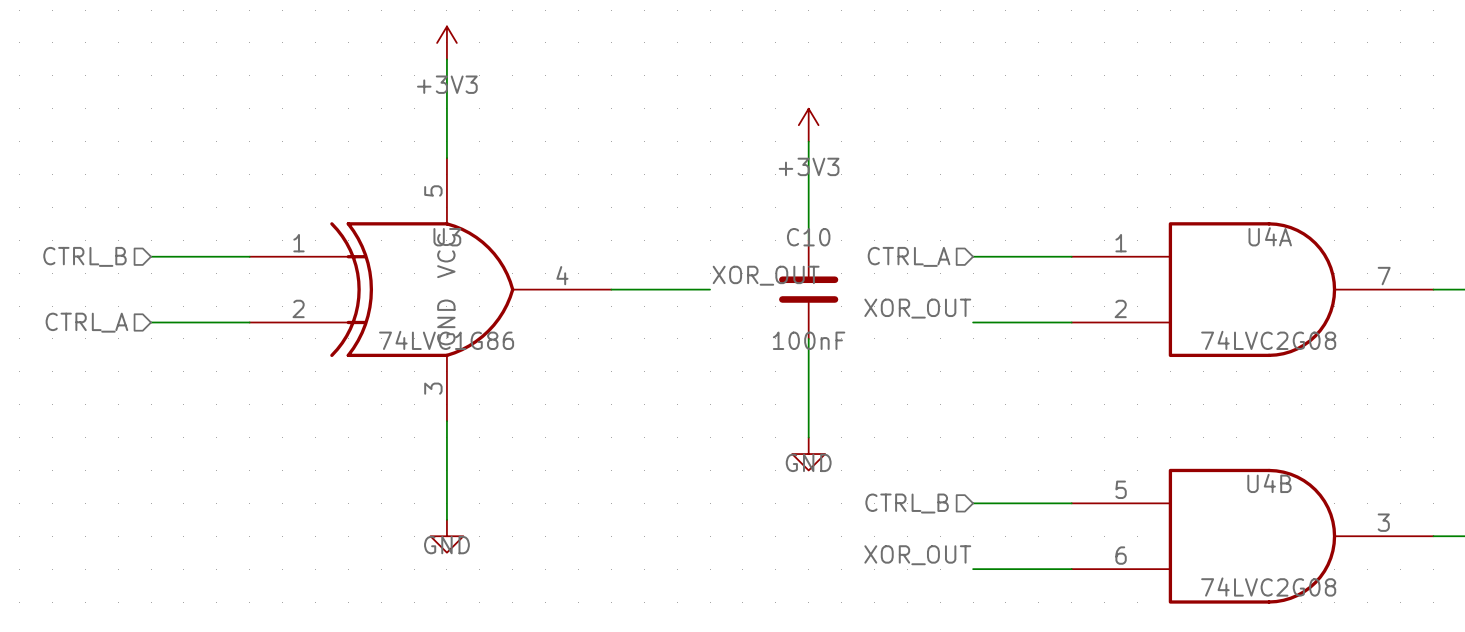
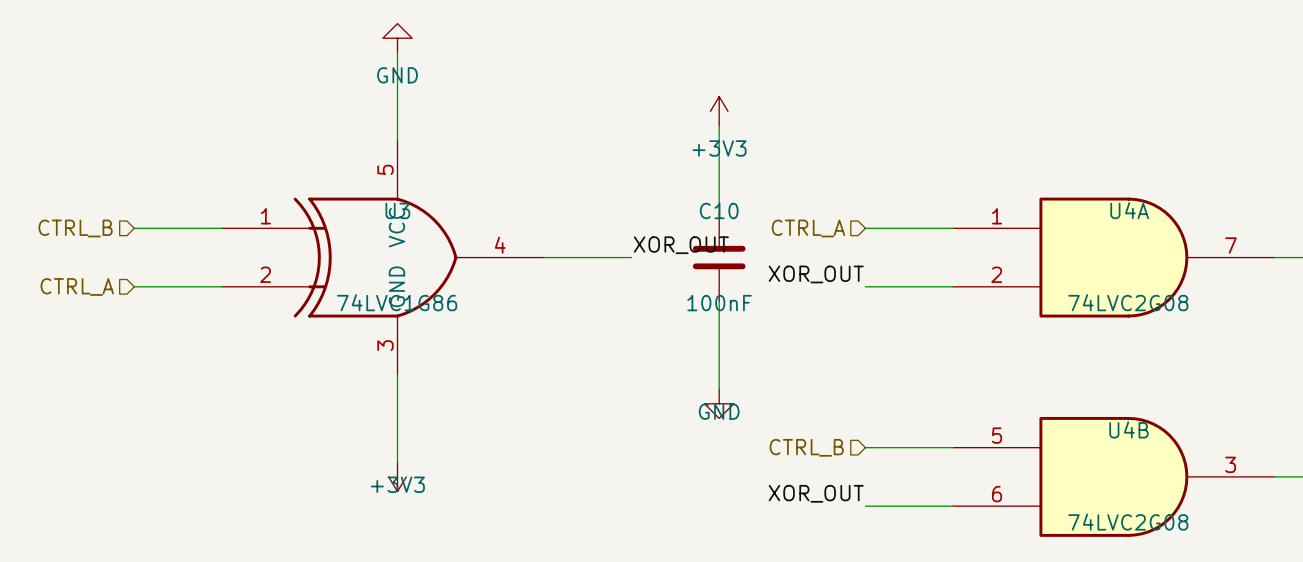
power symbol: +3V3 (446, 42) -> GND (397, 38)
power symbol: GND (446, 536) -> +3V3 (397, 476)

